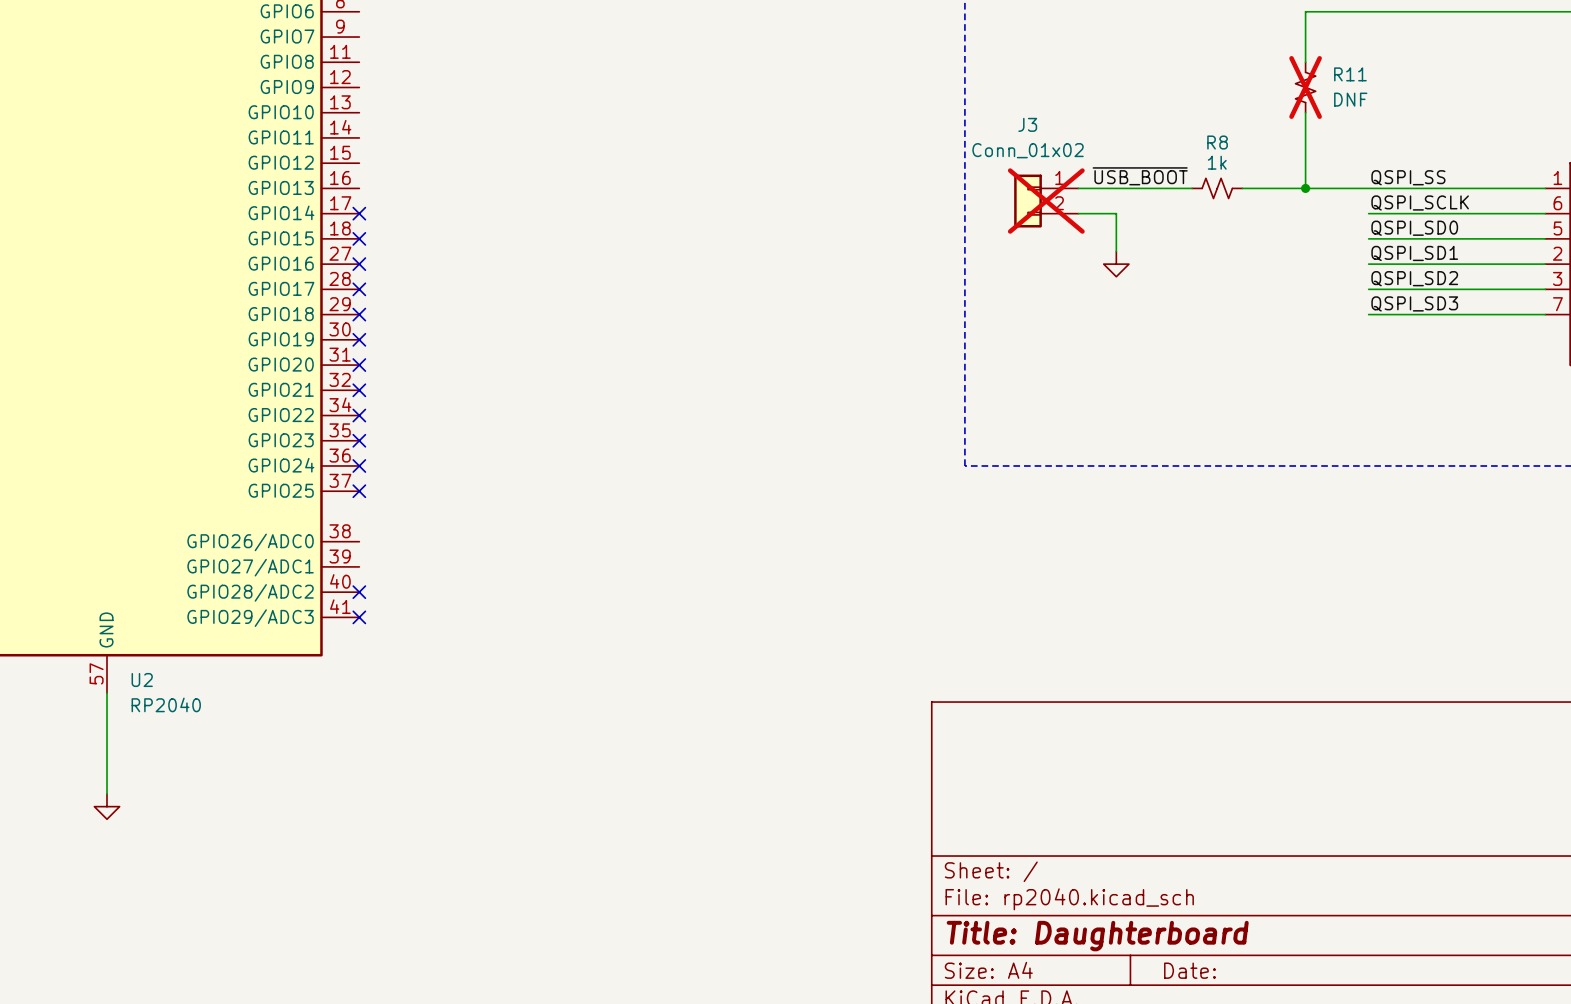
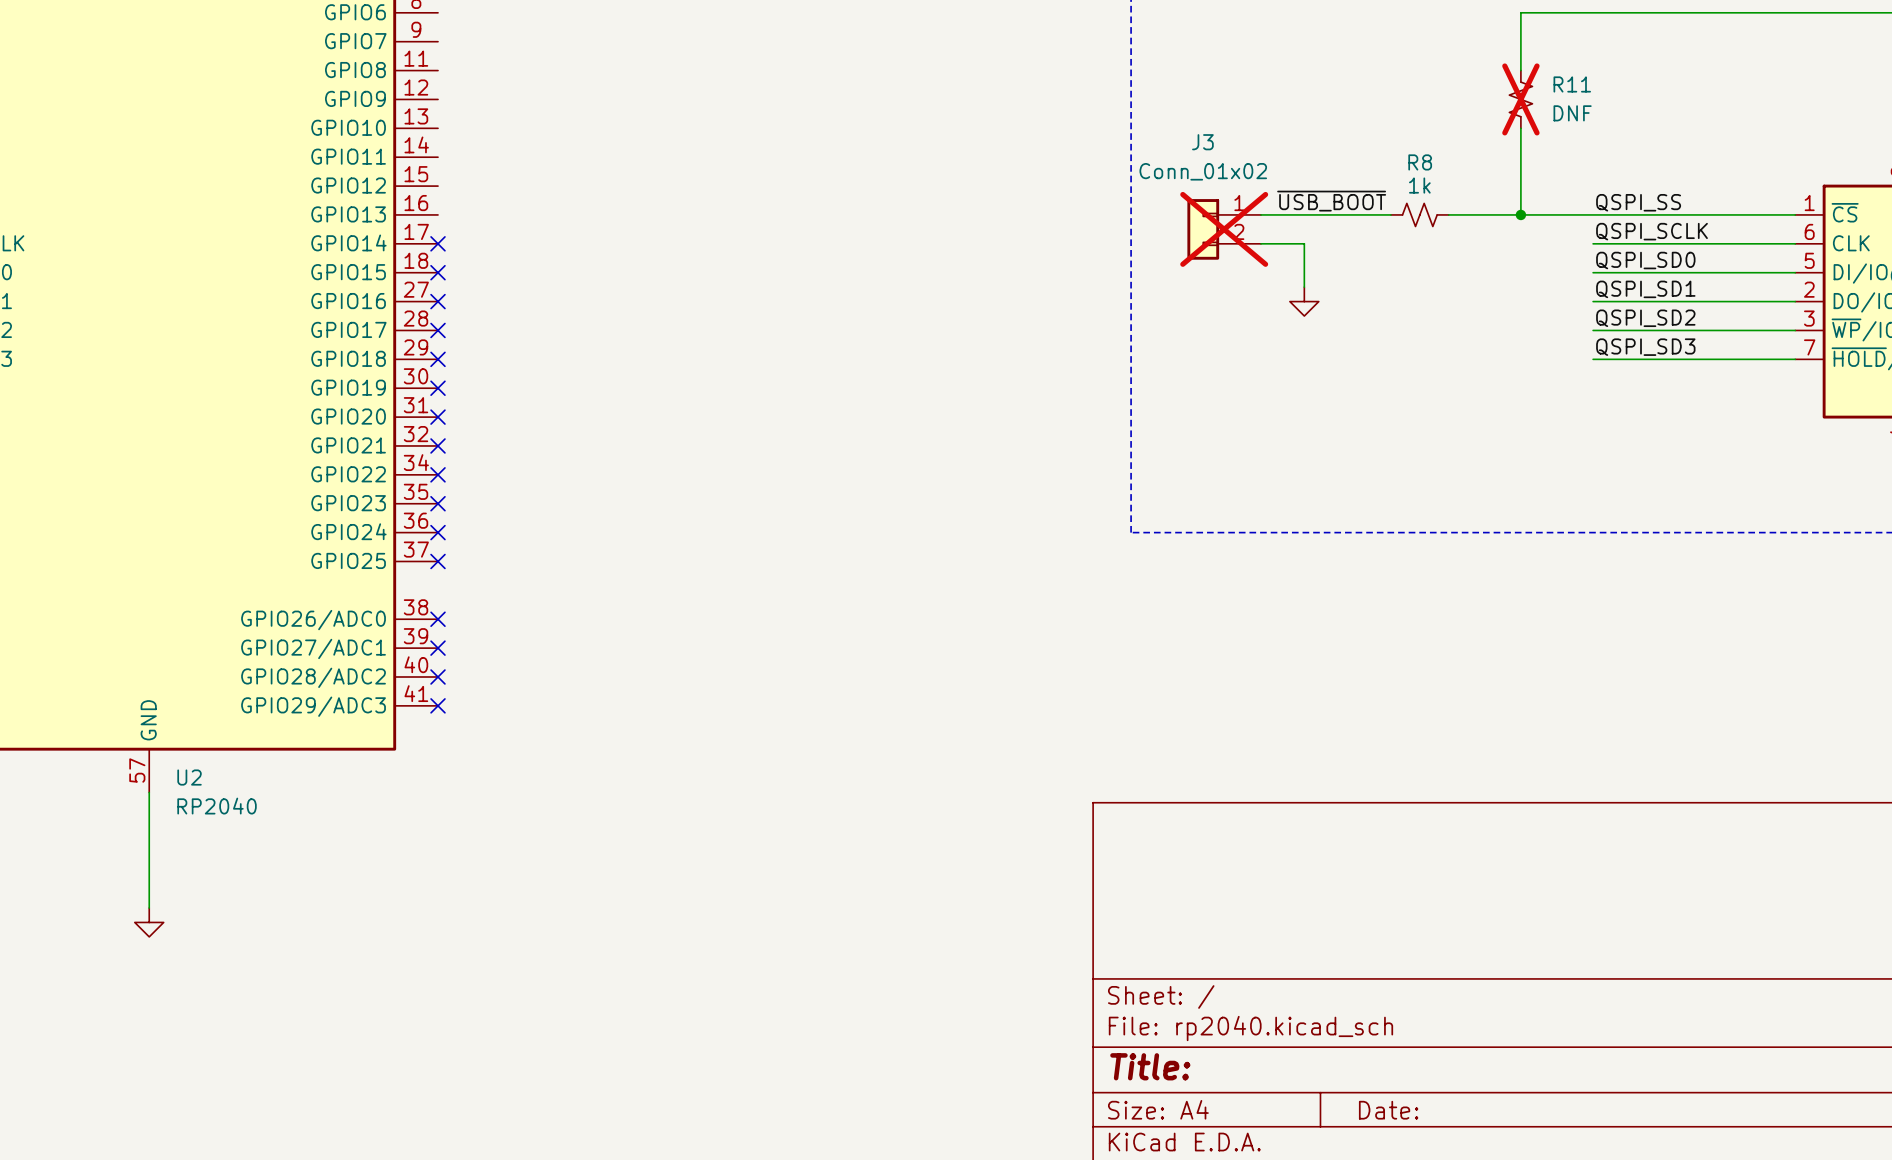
no-connect mark: none -> (438, 619)
no-connect mark: none -> (438, 648)
title block: Title: Daughterboard (1097, 936) -> Title: (1150, 1066)

